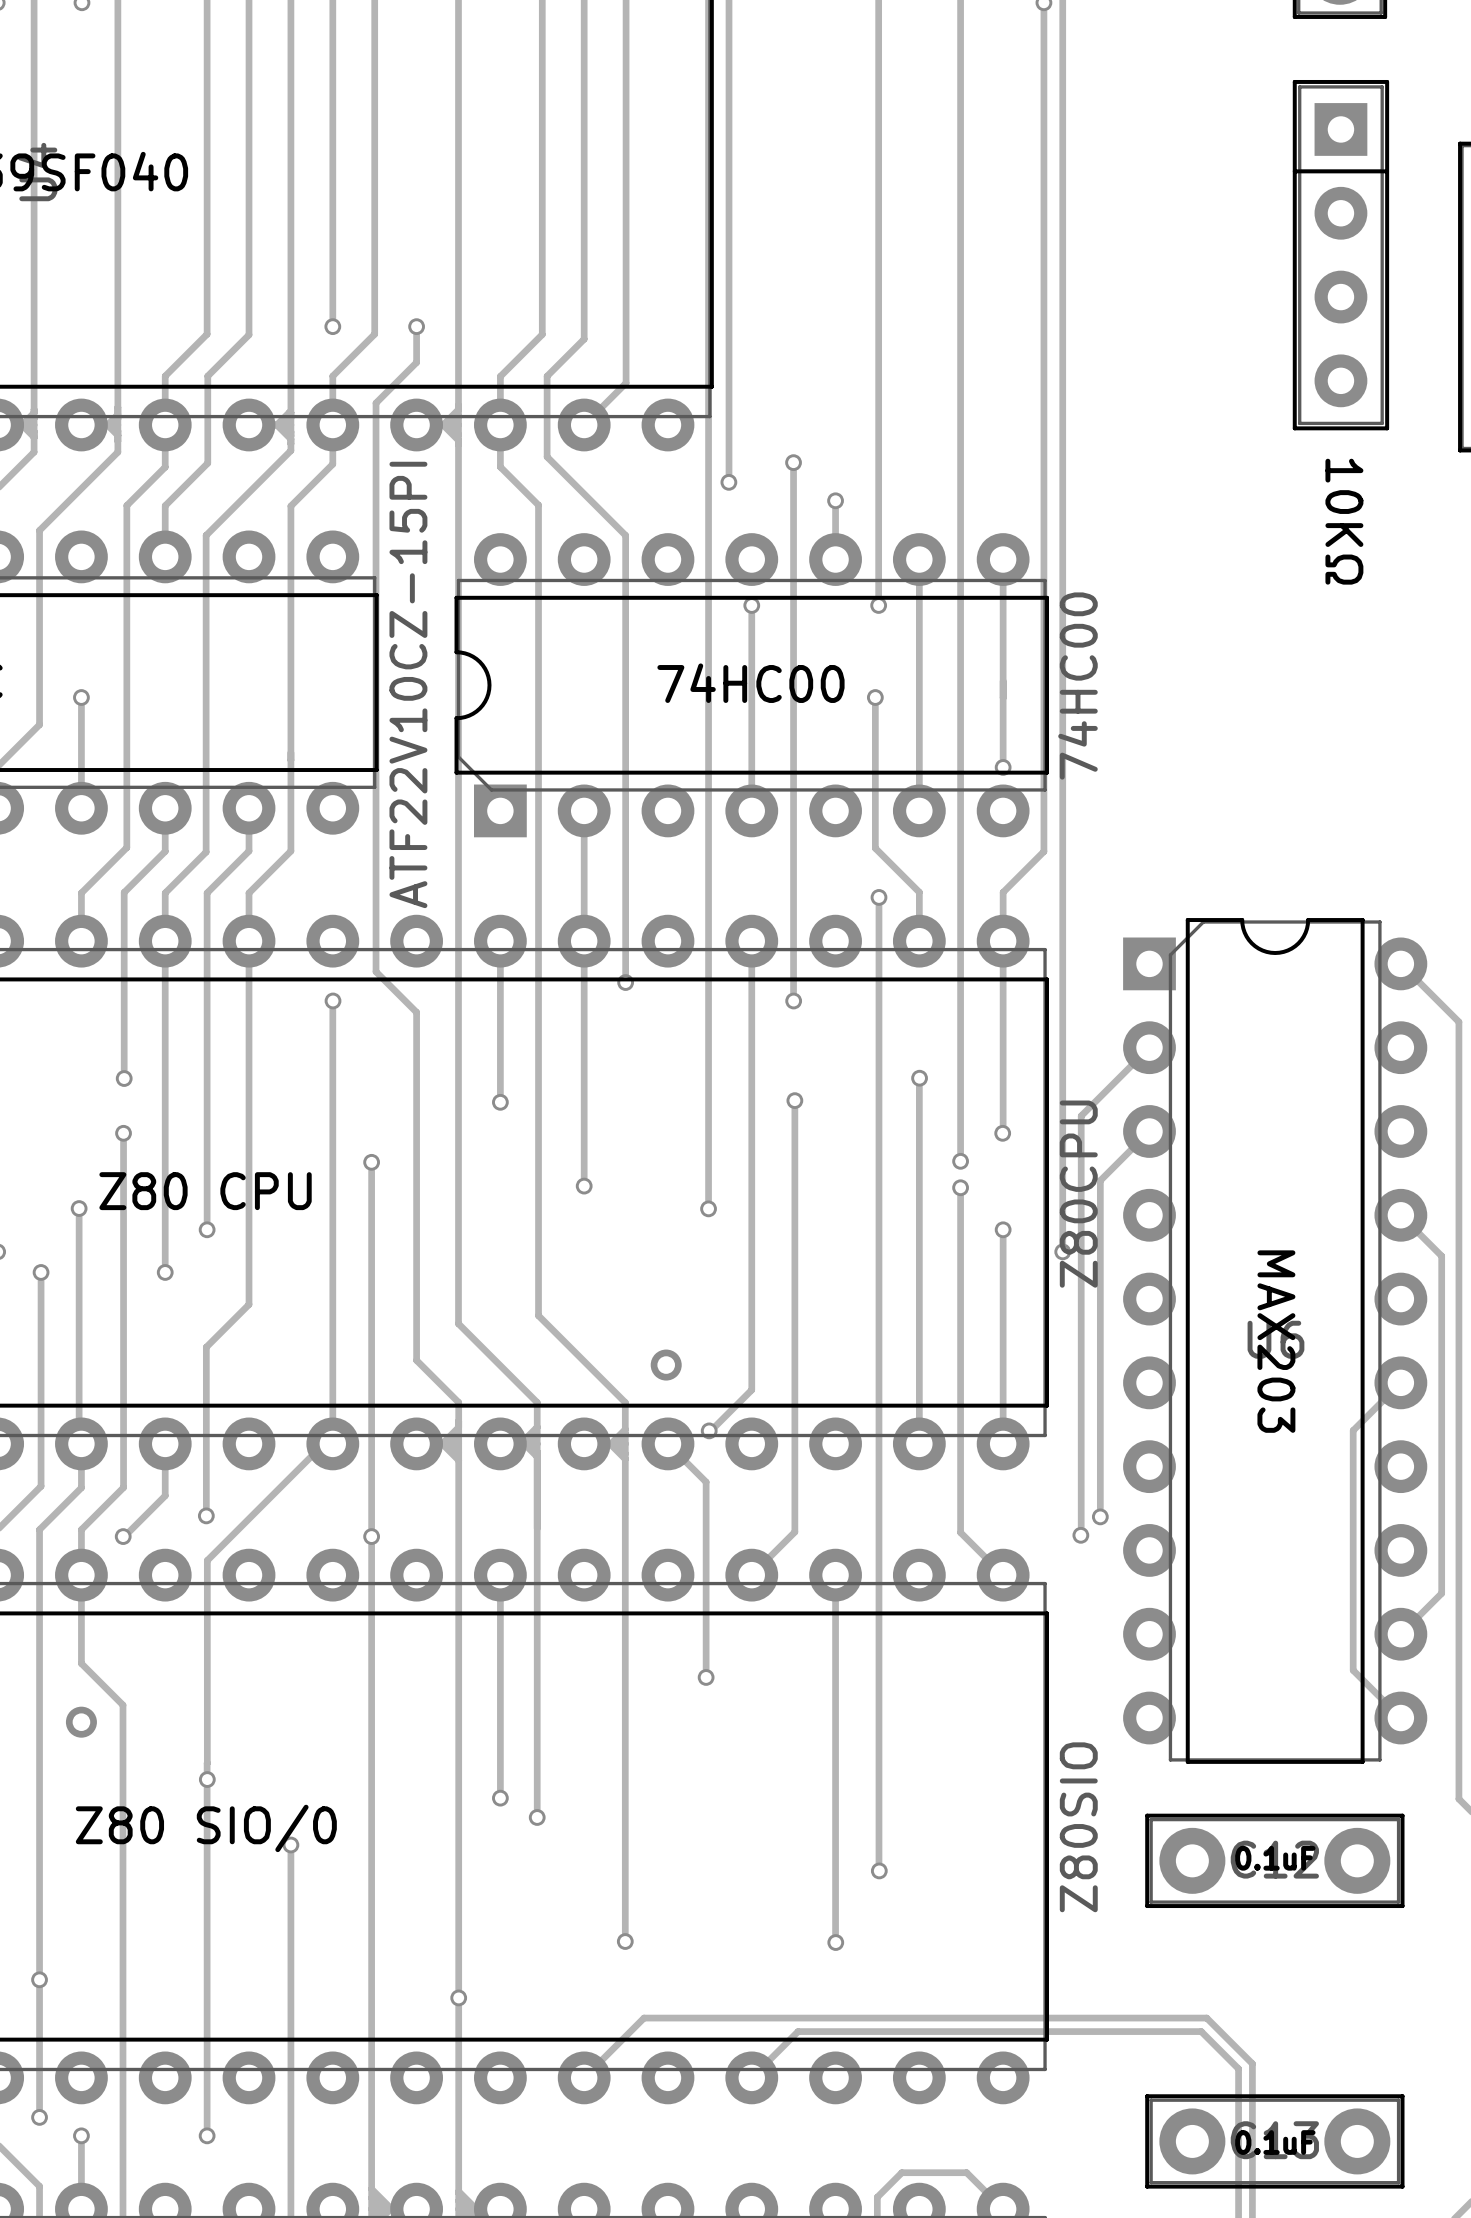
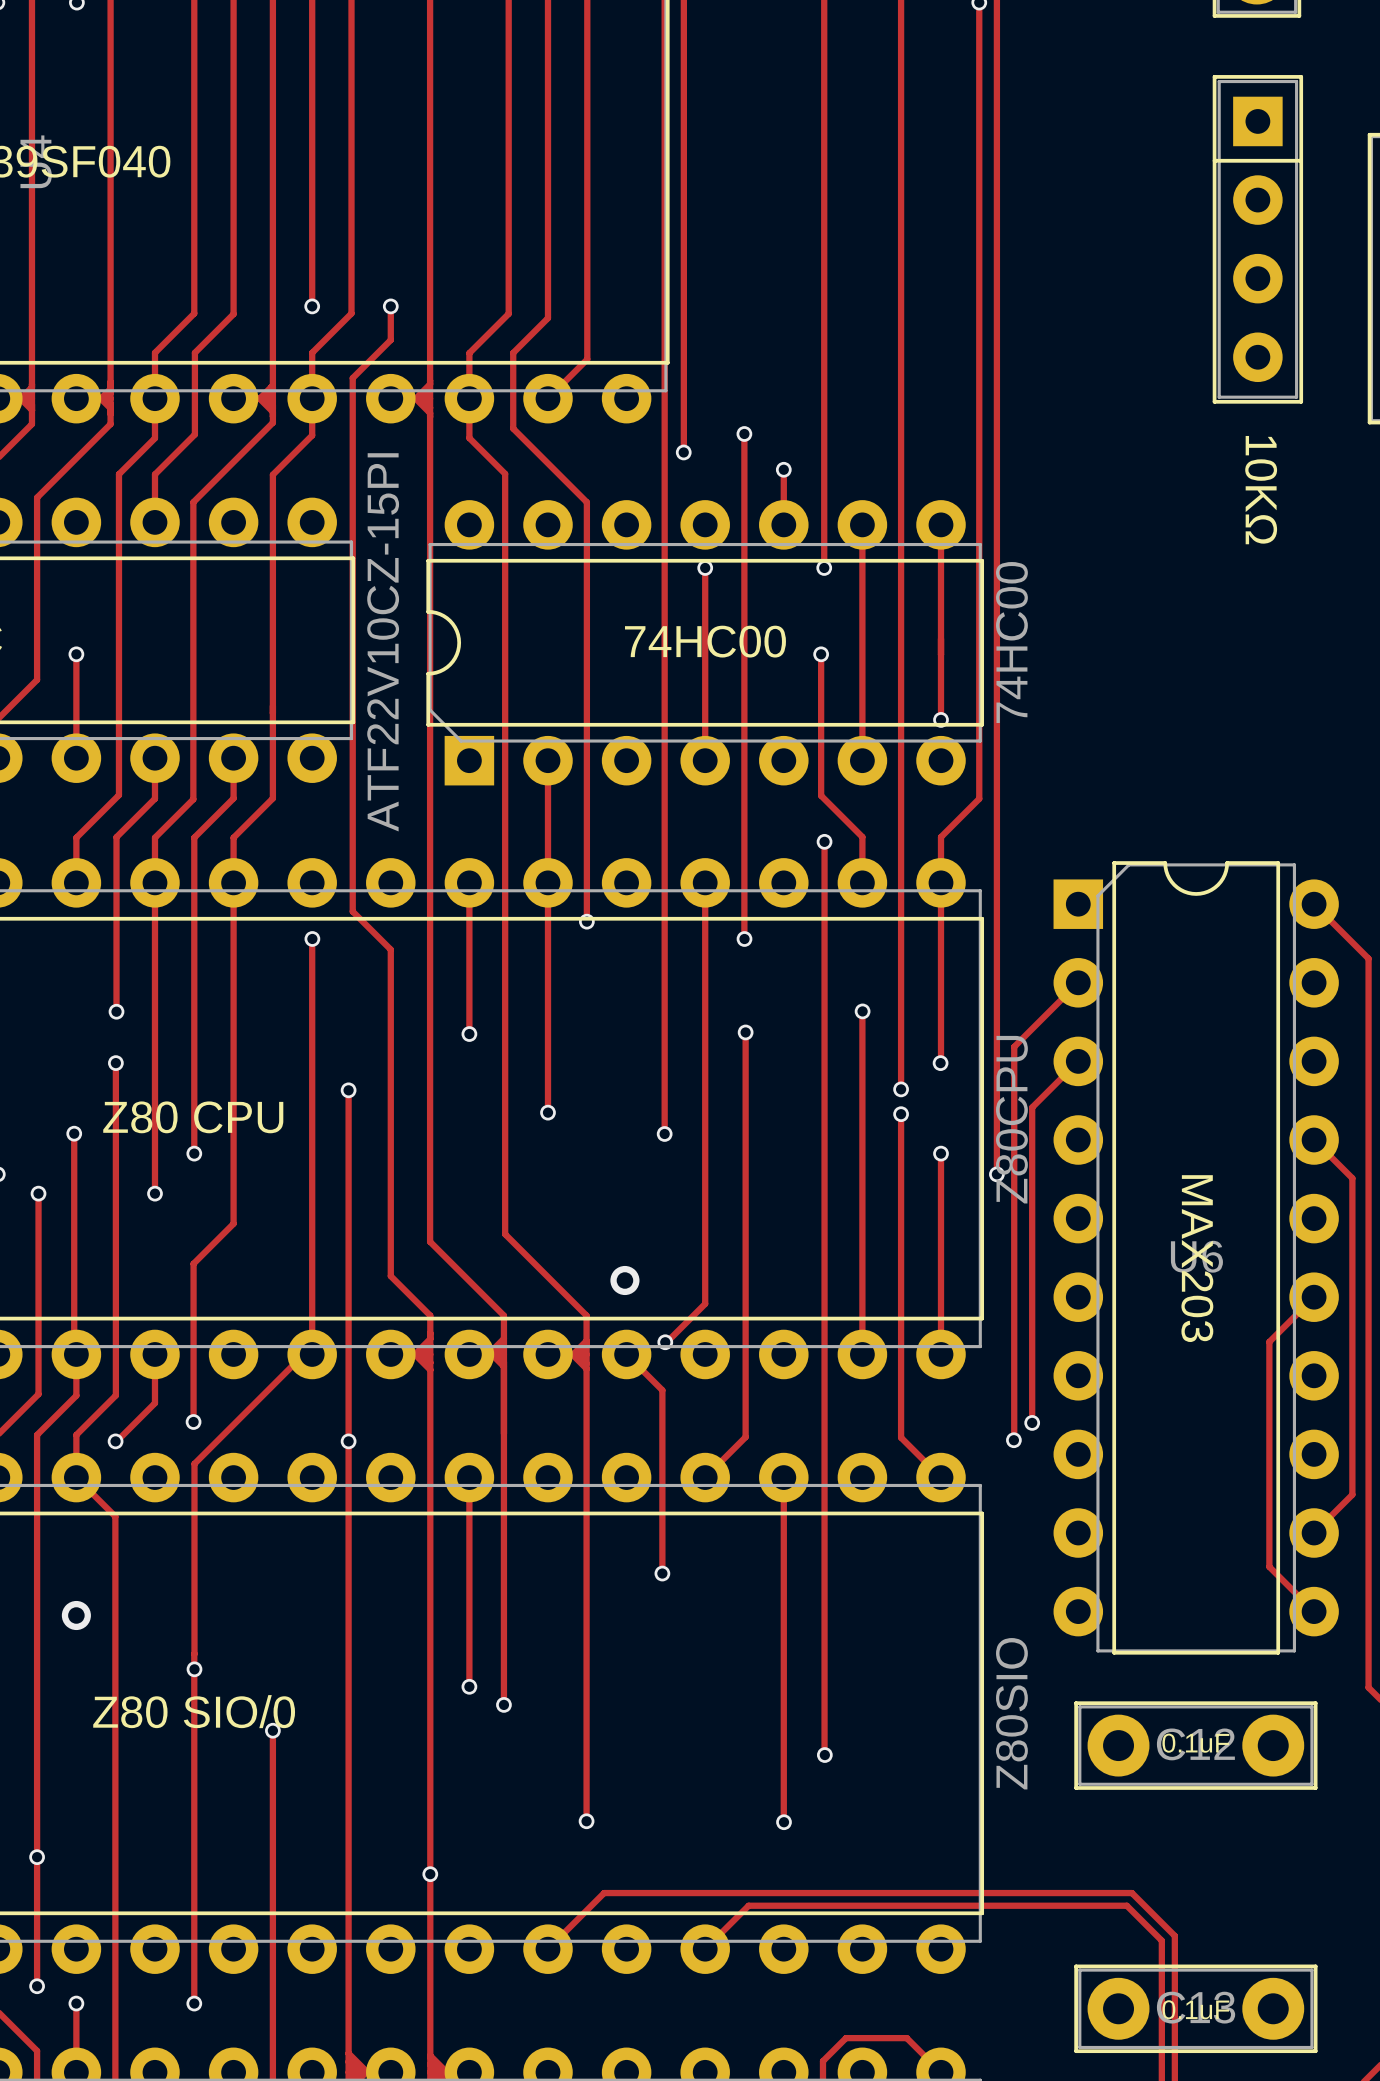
track: (81, 1575) (81, 1663) (123, 1705) -> (76, 1477) (115, 1516) (115, 1599)

